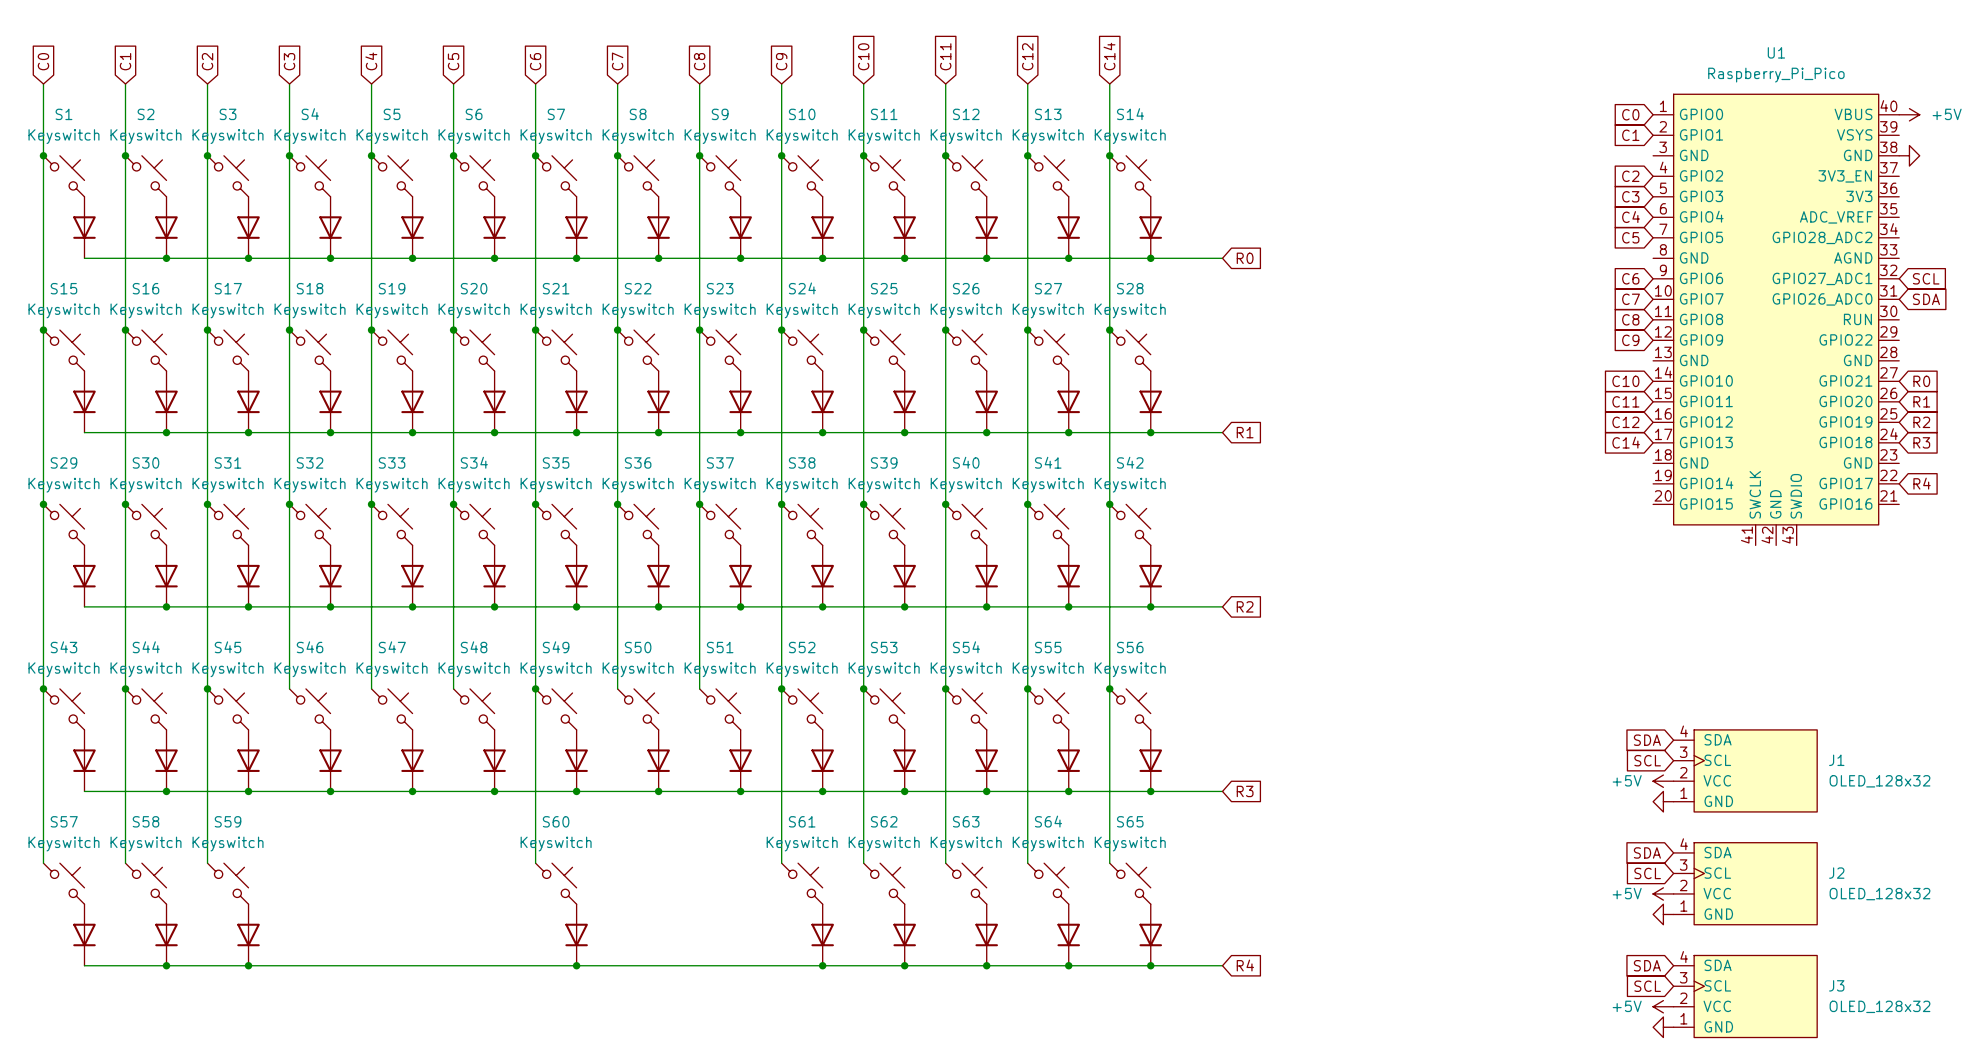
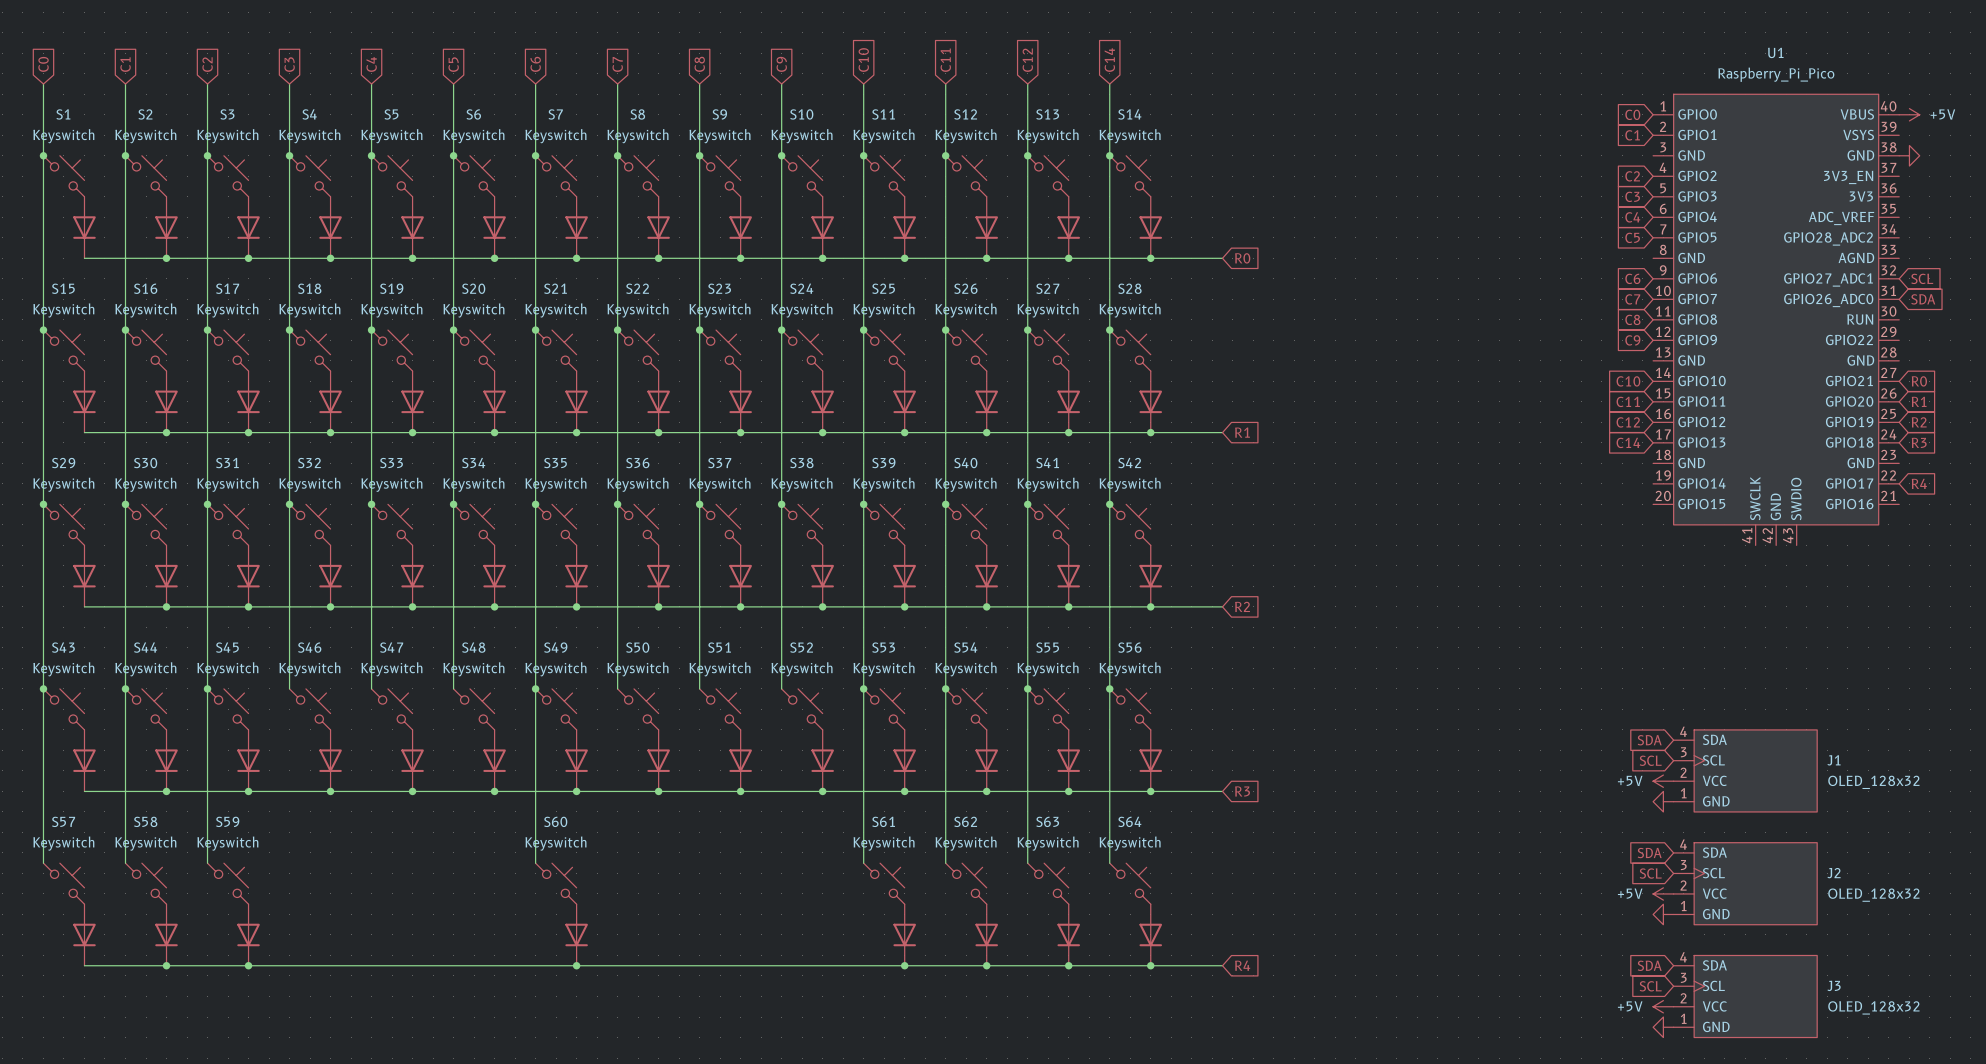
wire: (781, 688) (781, 863) -> none
junction: (781, 688) -> none
S62 name: S62 (884, 821) -> S61 (883, 821)
S63 name: S63 (966, 821) -> S62 (965, 821)
S64 name: S64 (1048, 821) -> S63 (1047, 821)
S65 name: S65 (1130, 821) -> S64 (1129, 821)
S61: Keyswitch (802, 883) -> none
part: (822, 934) -> none
junction: (822, 965) -> none

